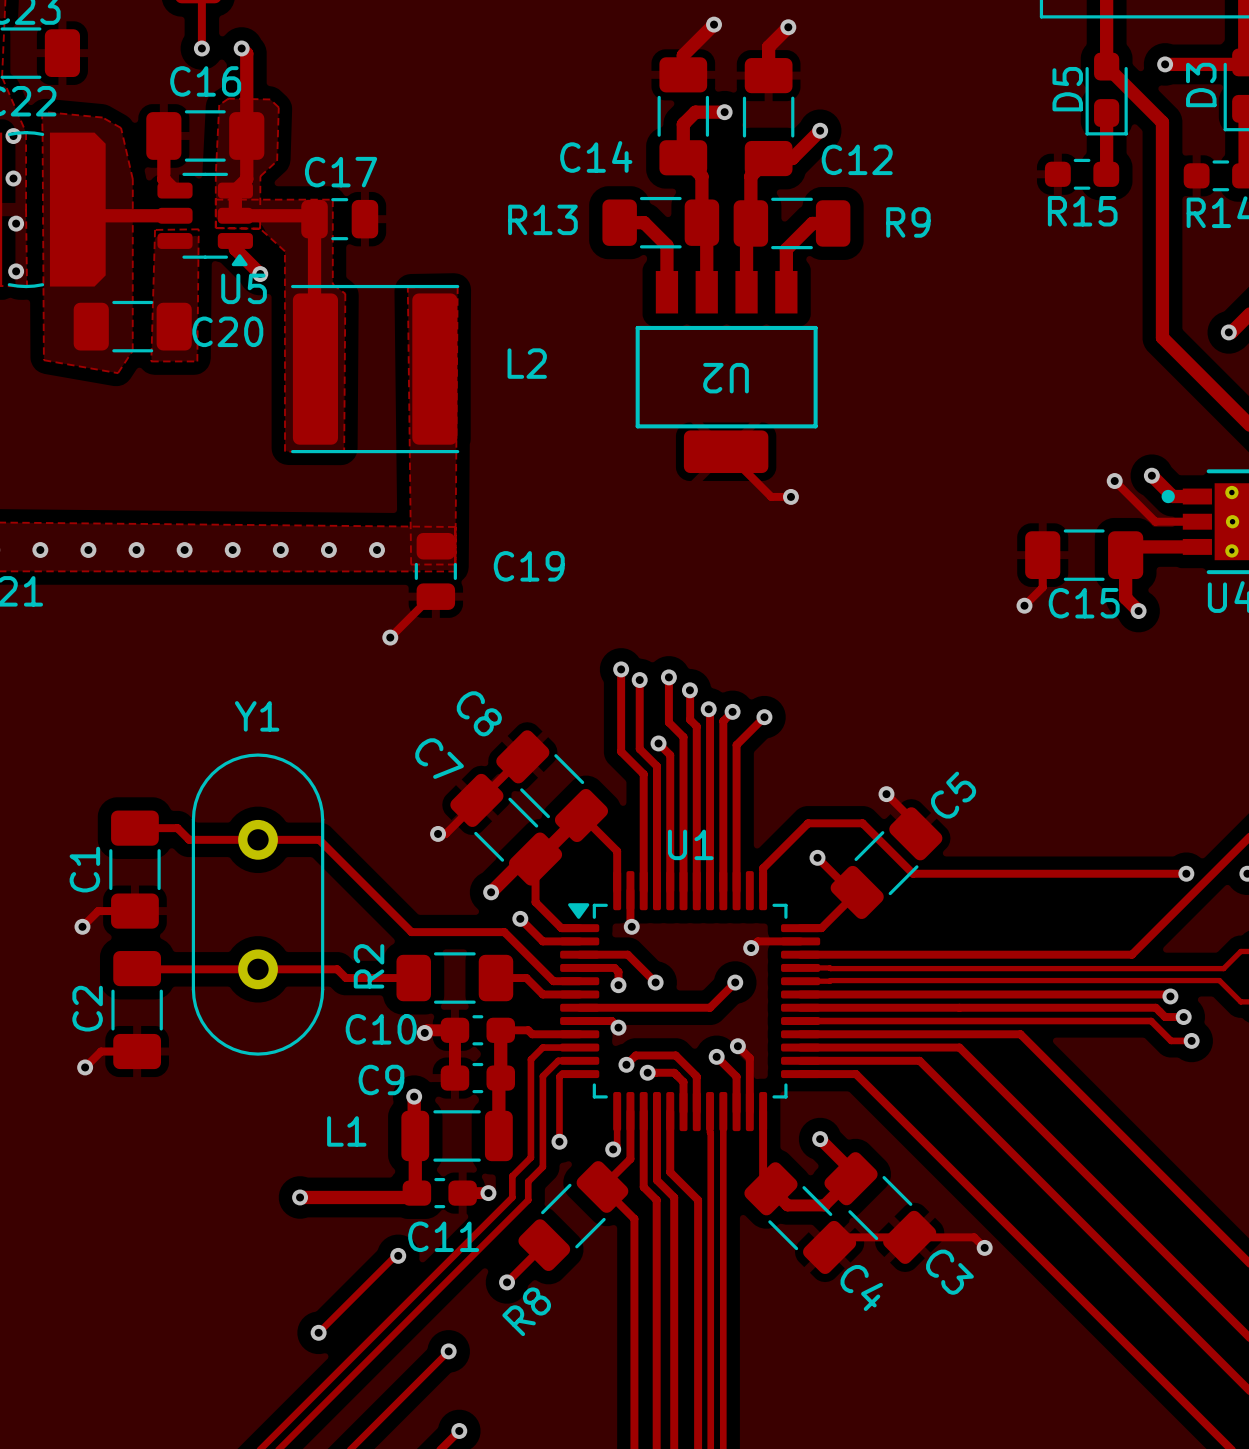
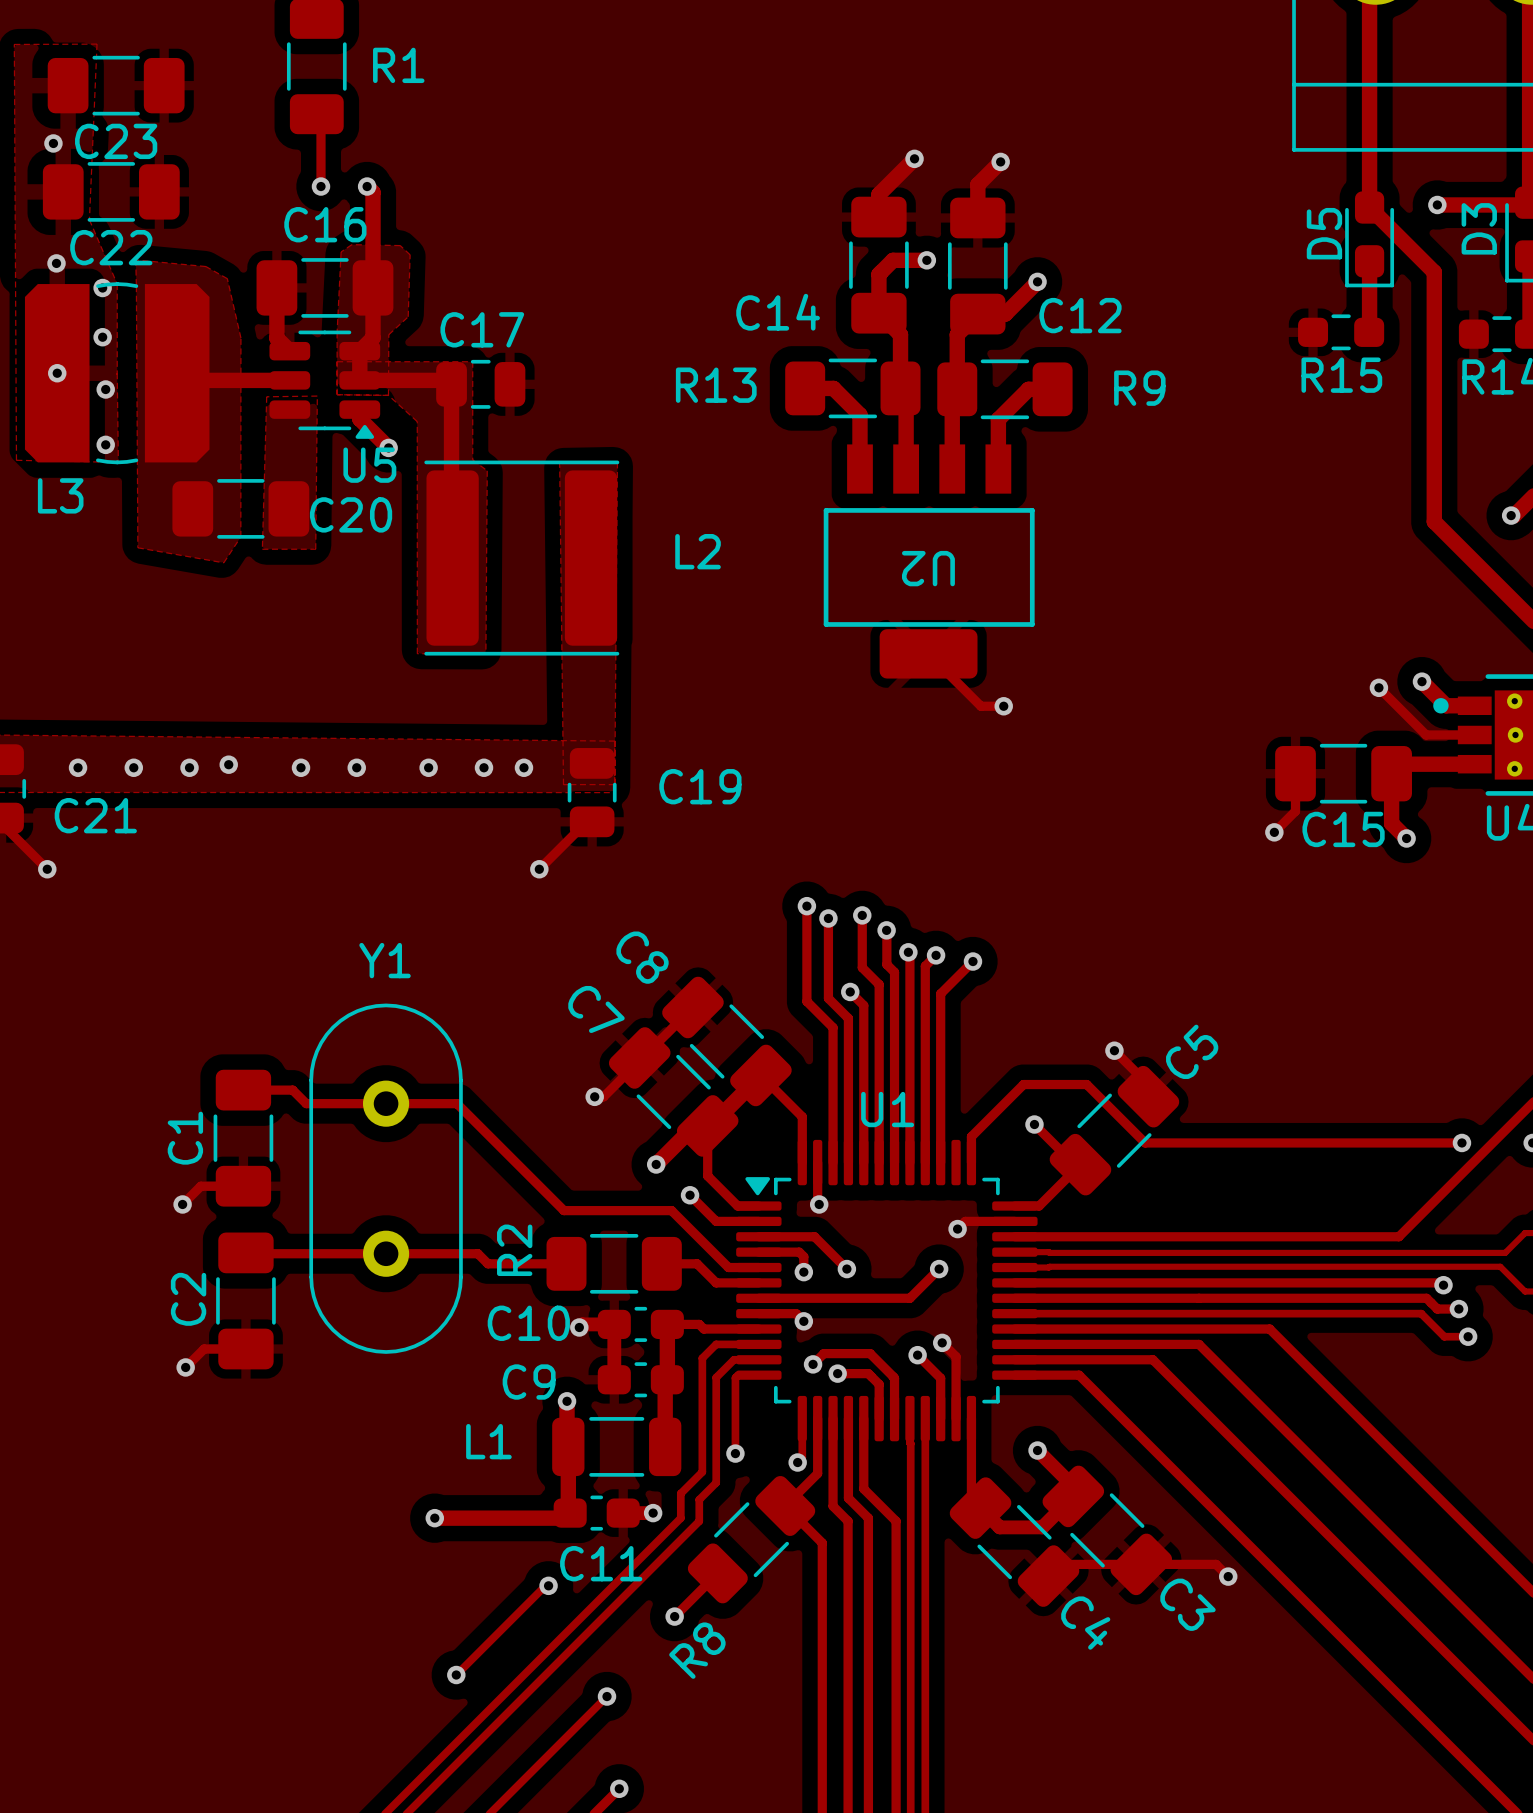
via position: (136, 550) -> (228, 764)
via position: (280, 550) -> (428, 767)
via position: (328, 550) -> (483, 767)

